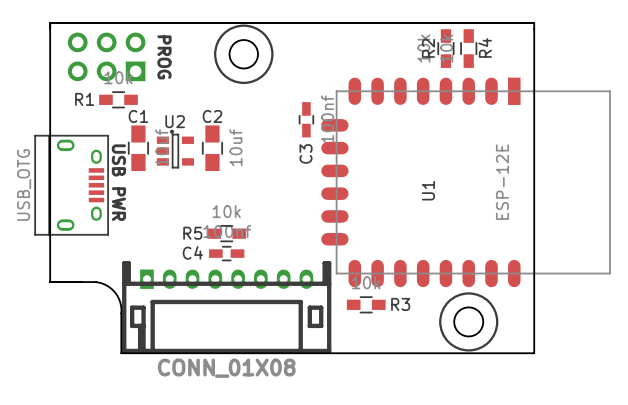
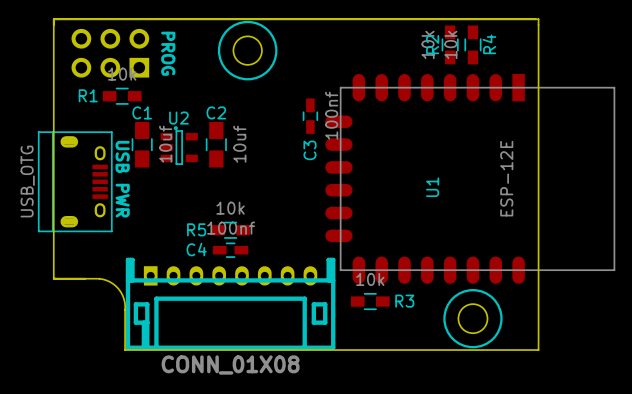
board edge: none -> (64, 141) (74, 141)
board edge: none -> (64, 221) (74, 221)

